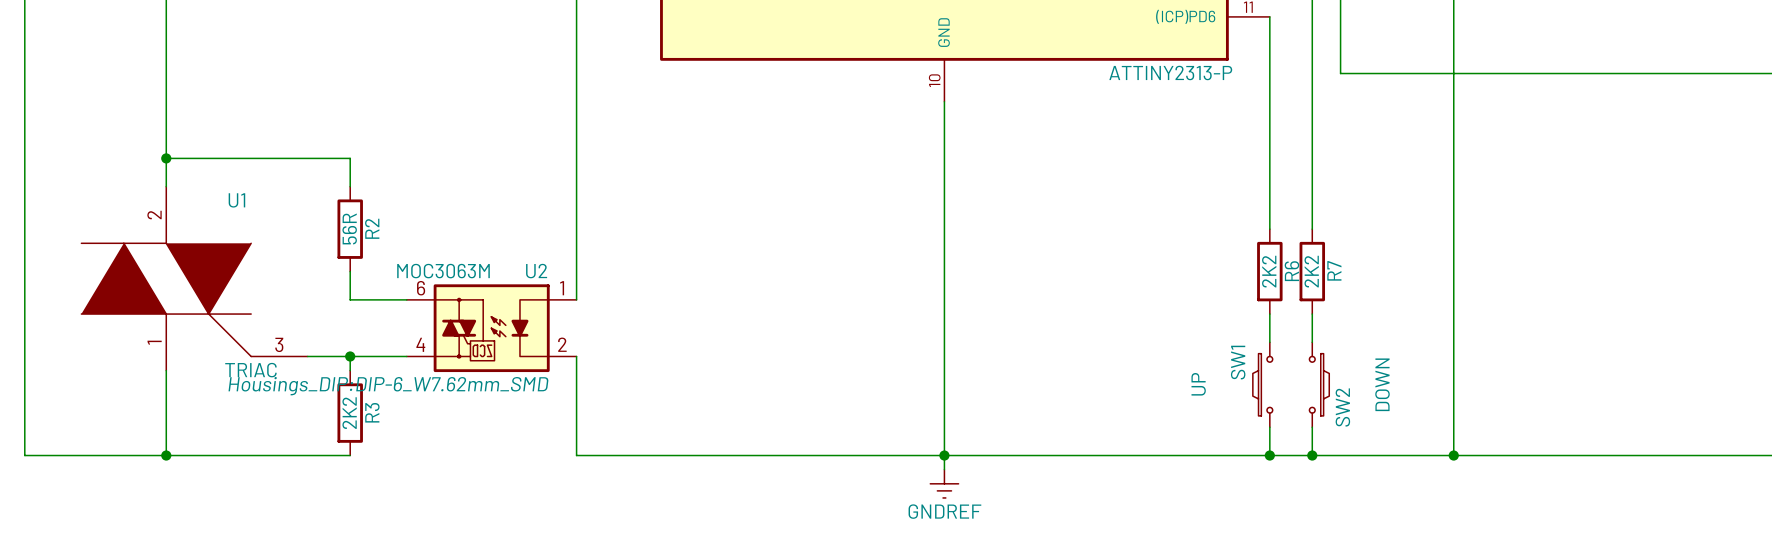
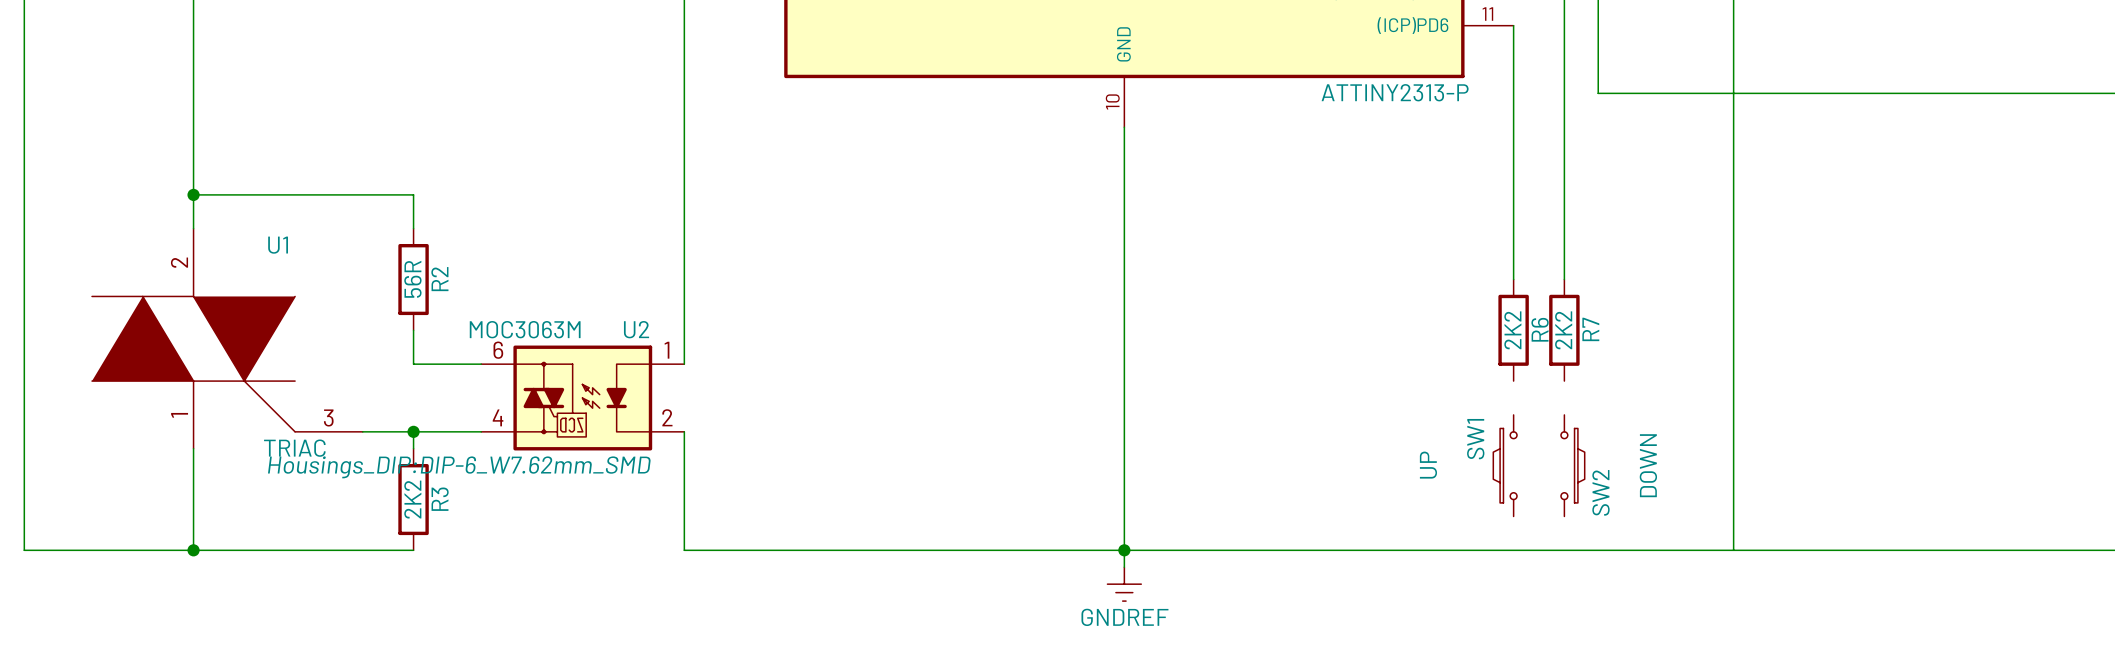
wire: (1269, 314) (1269, 342) -> none
wire: (1312, 314) (1312, 342) -> none
wire: (1269, 427) (1269, 455) -> none
wire: (1312, 427) (1312, 455) -> none
junction: (1269, 455) -> none
junction: (1312, 455) -> none
junction: (1453, 455) -> none

